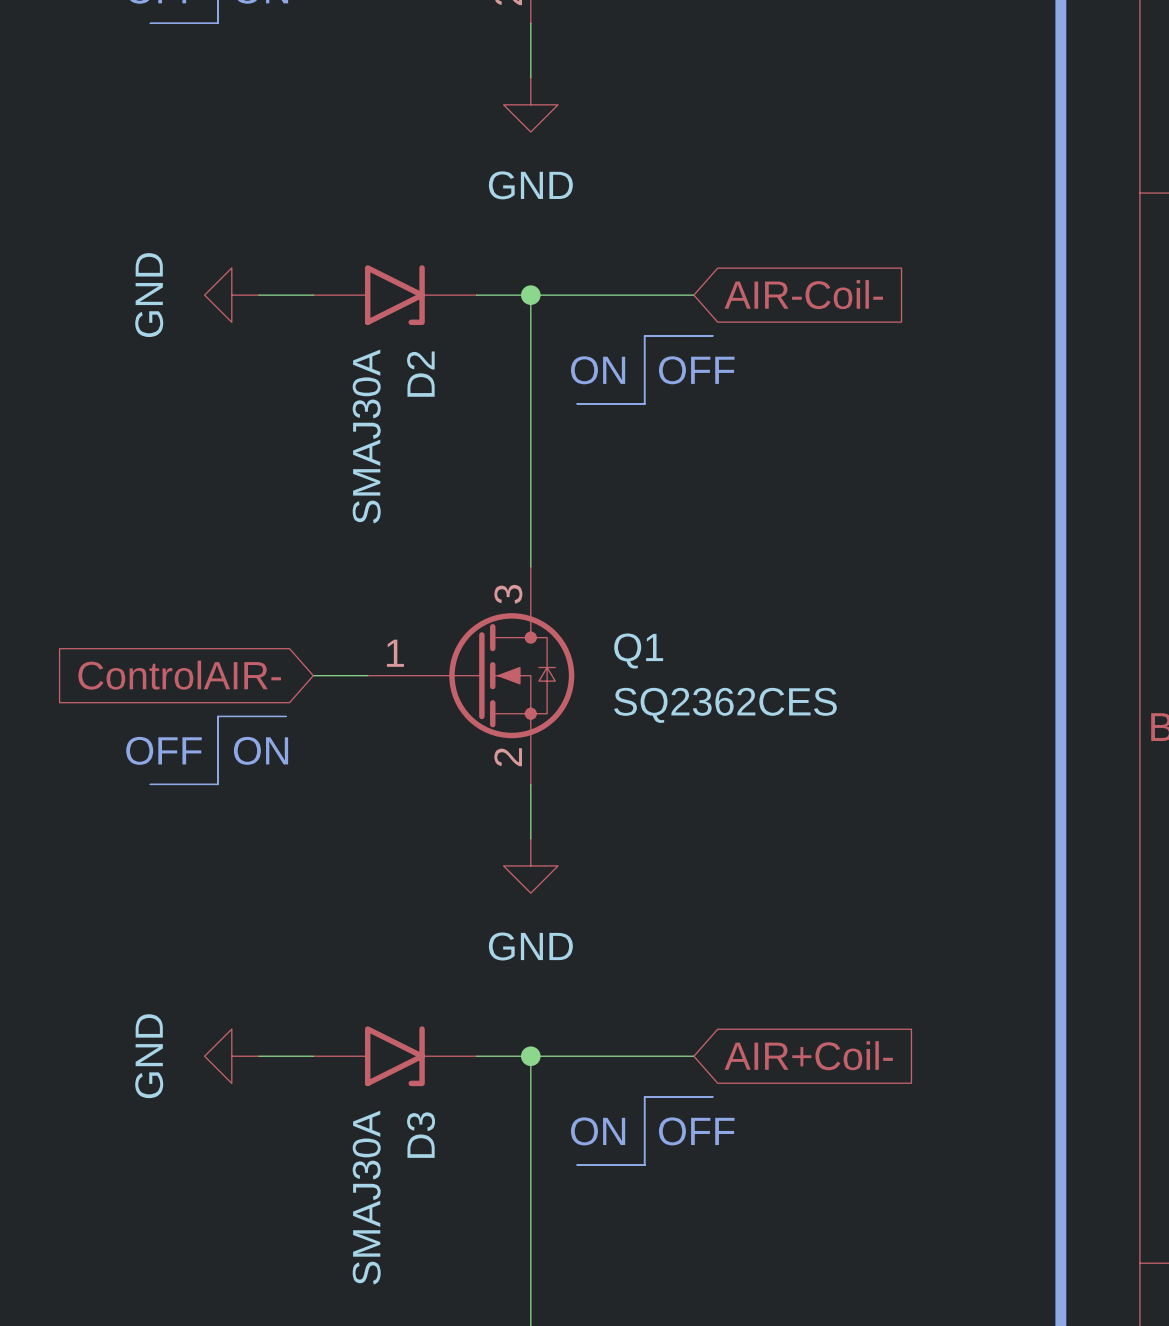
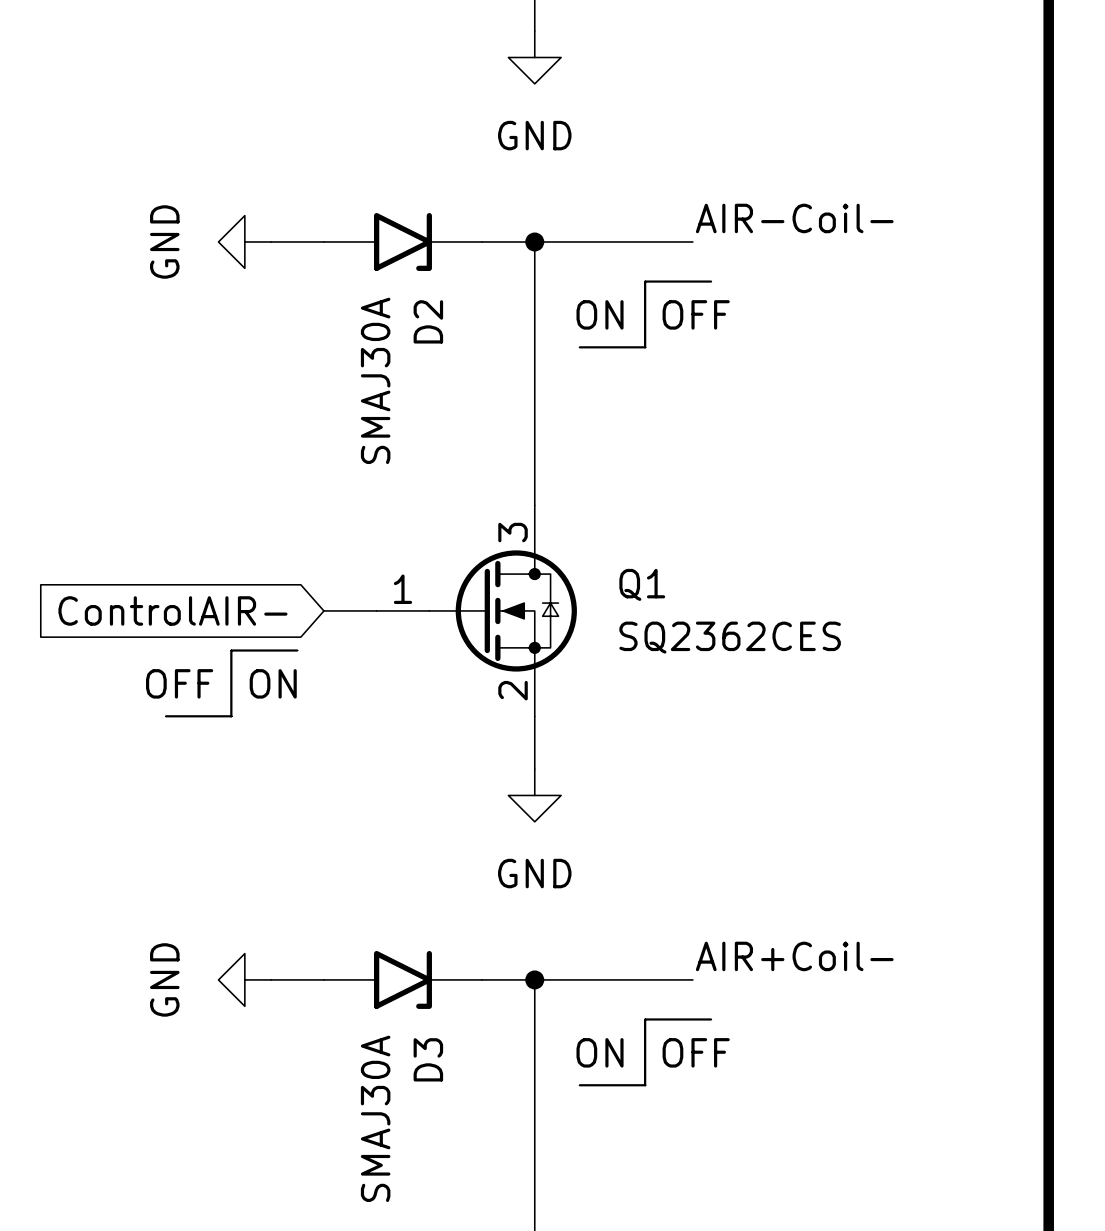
label: none -> AIR-Coil- (794, 218)
global label: AIR-Coil- (803, 294) -> none
label: none -> AIR+Coil- (794, 956)
global label: AIR+Coil- (808, 1055) -> none

